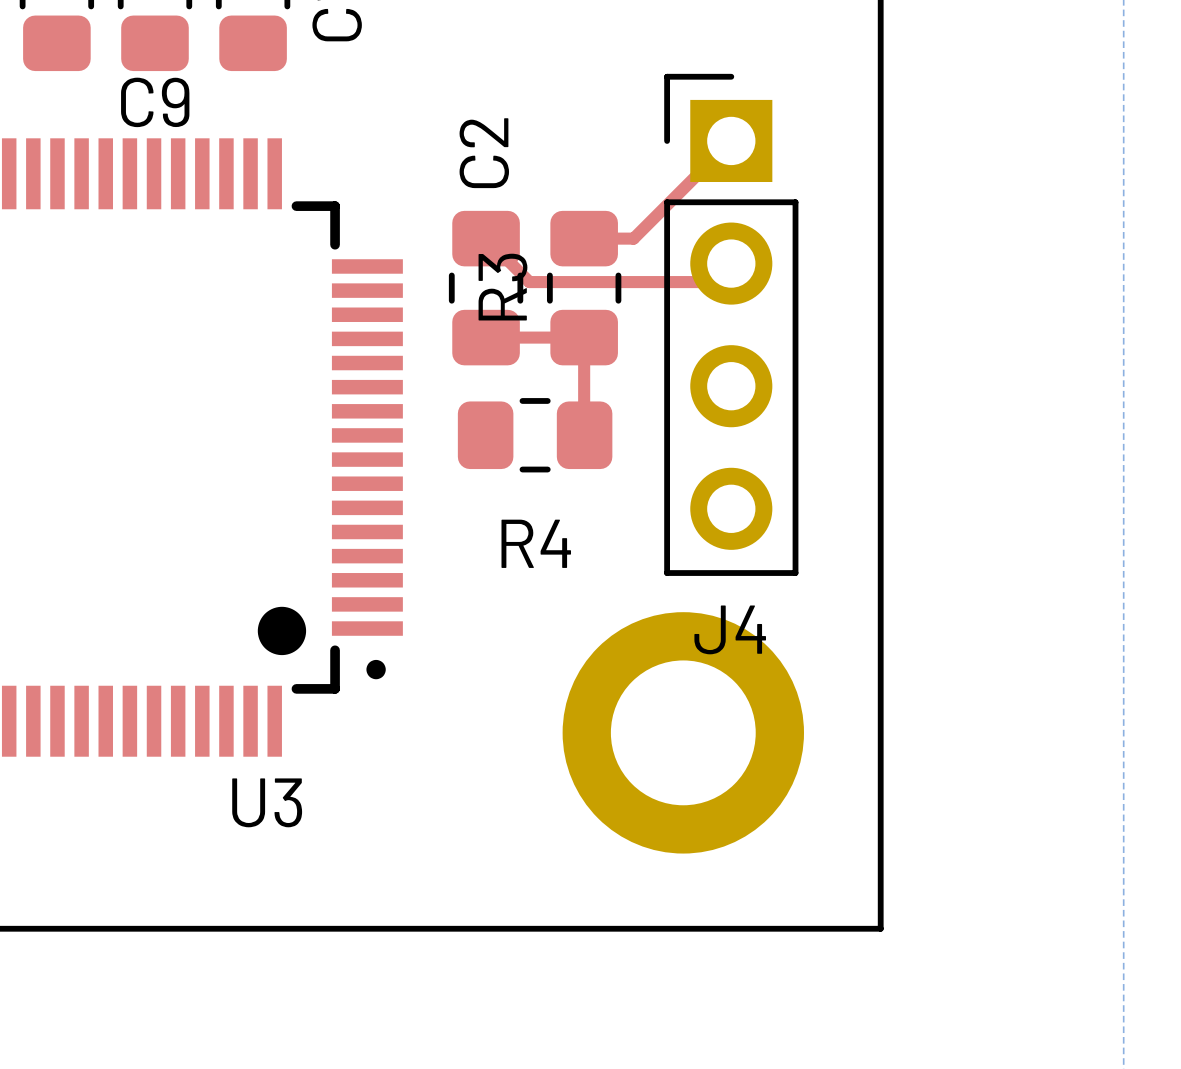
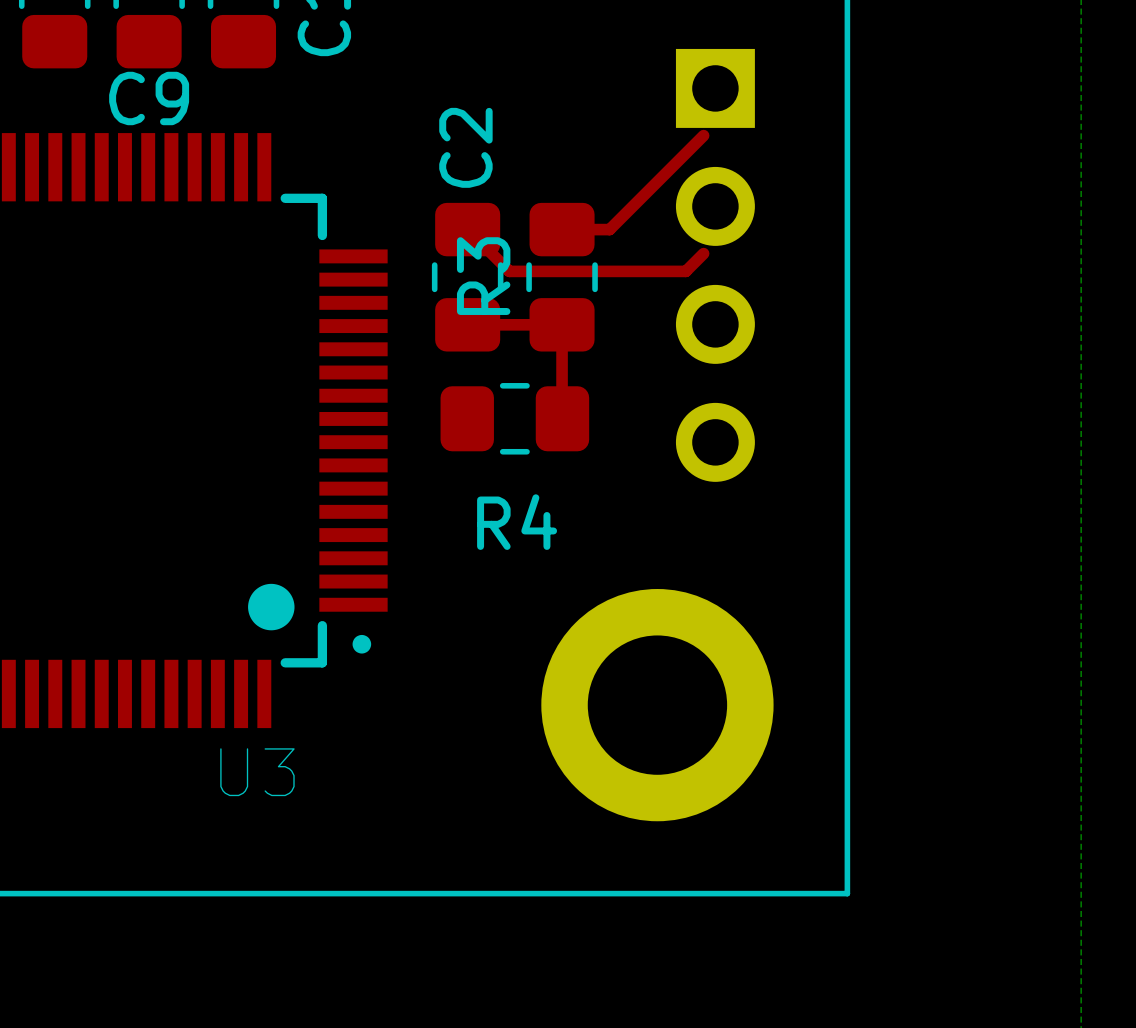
J4 side: top (731, 324) -> bottom (715, 265)

